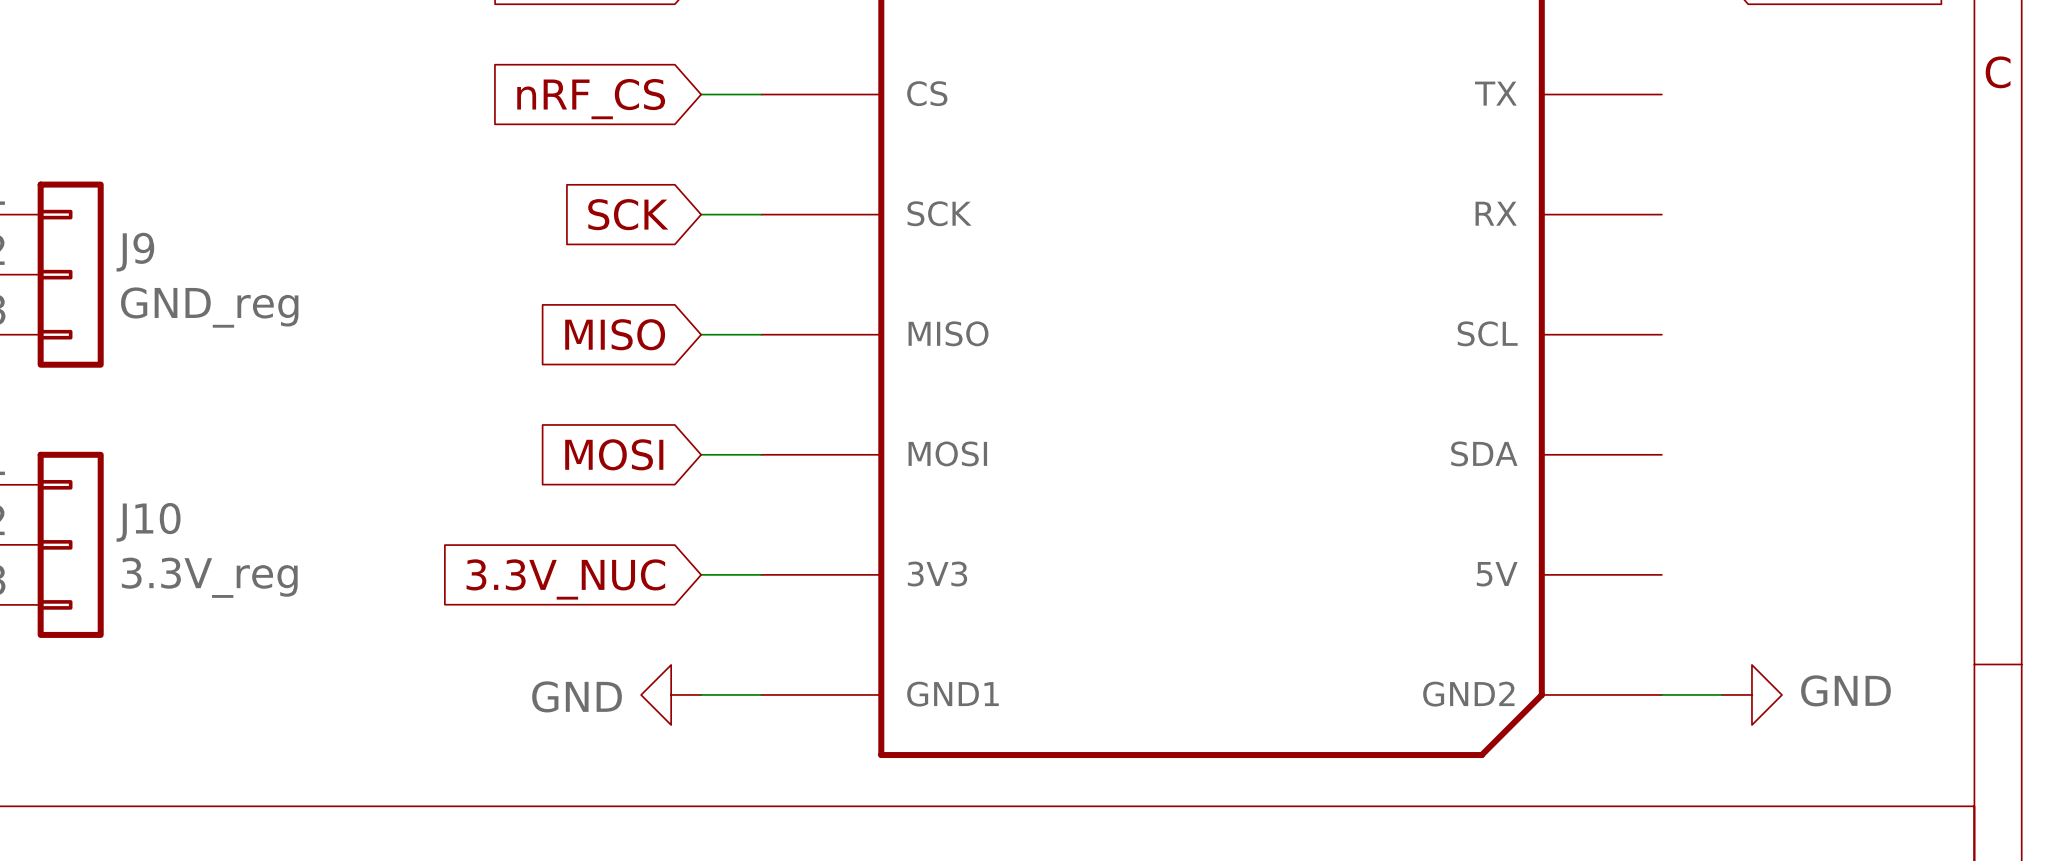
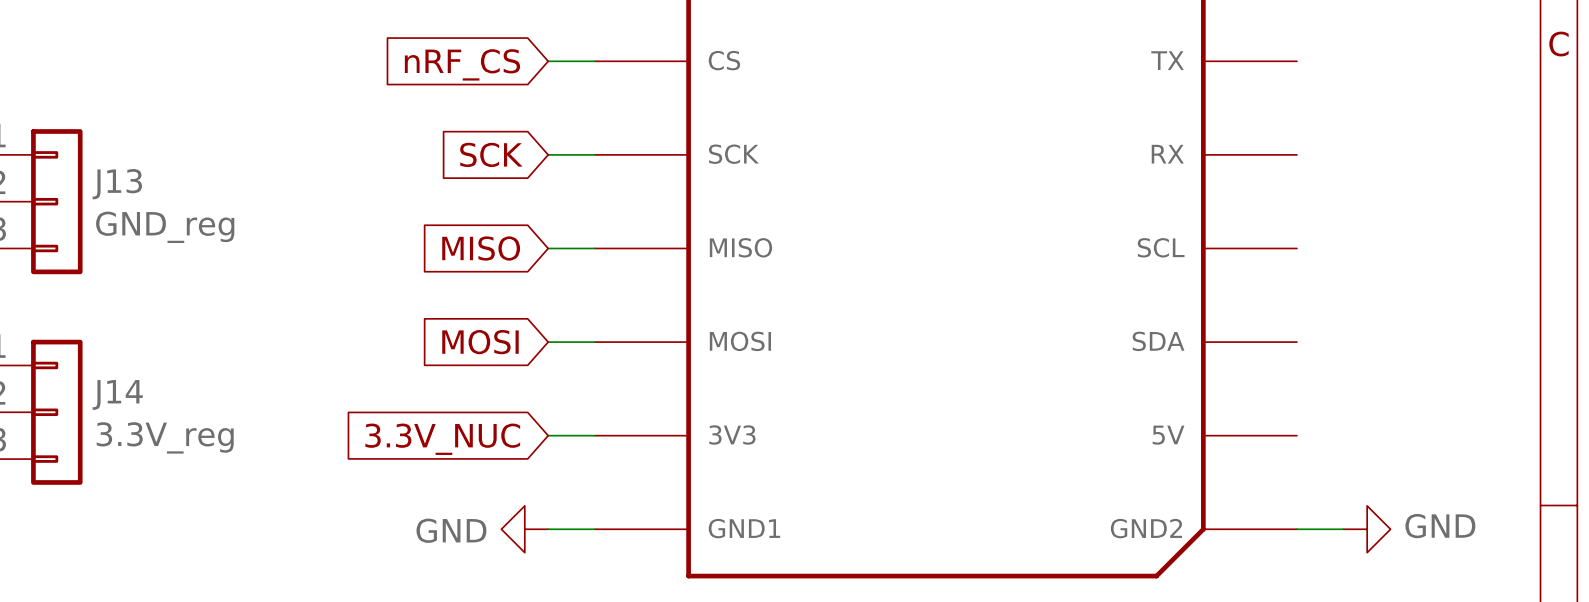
J9 name: J9 (135, 252) -> J13 (117, 184)
J10 name: J10 (148, 522) -> J14 (117, 394)

